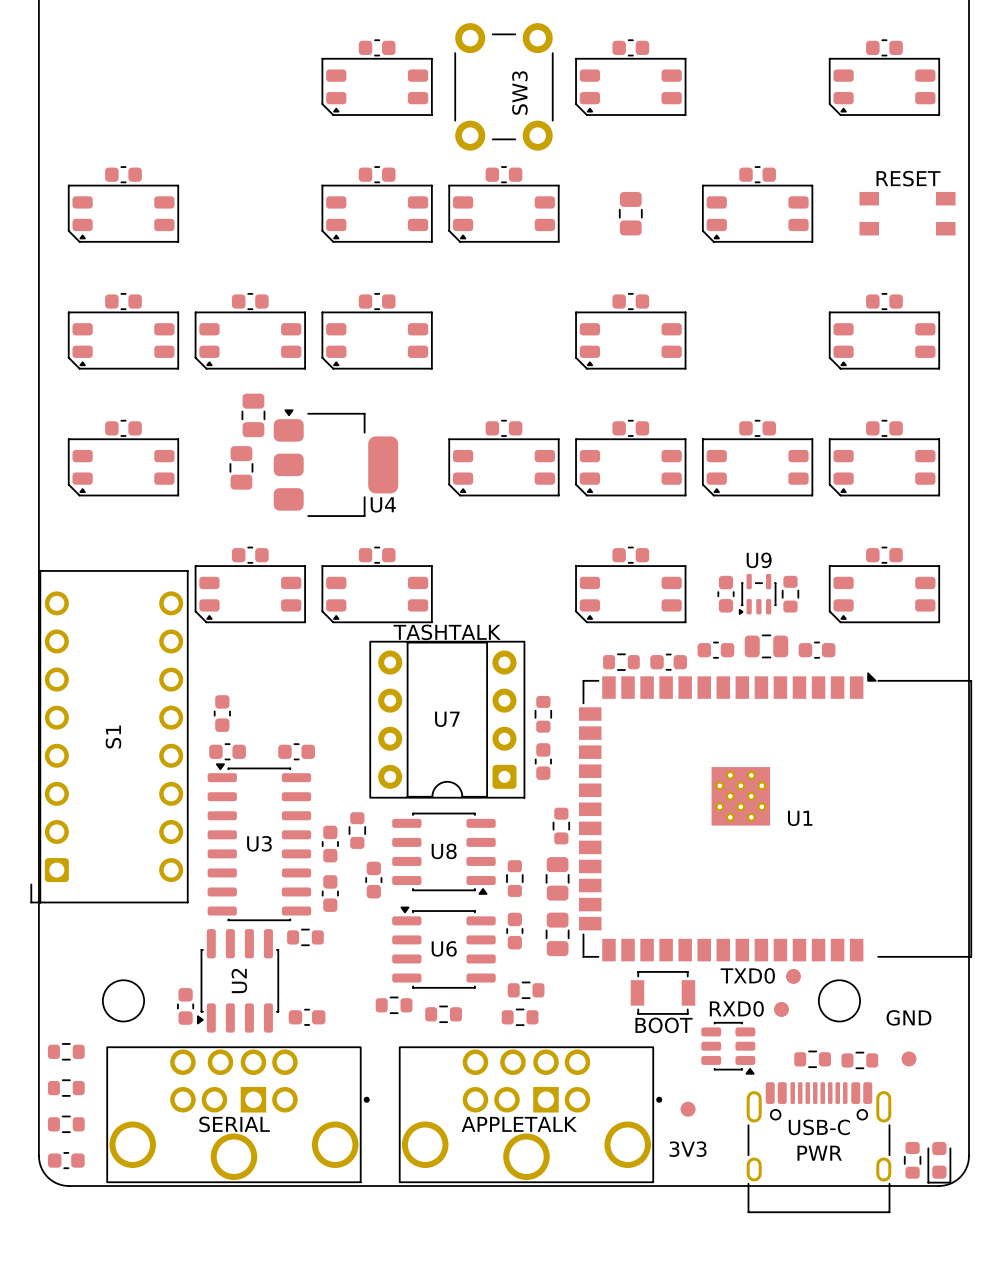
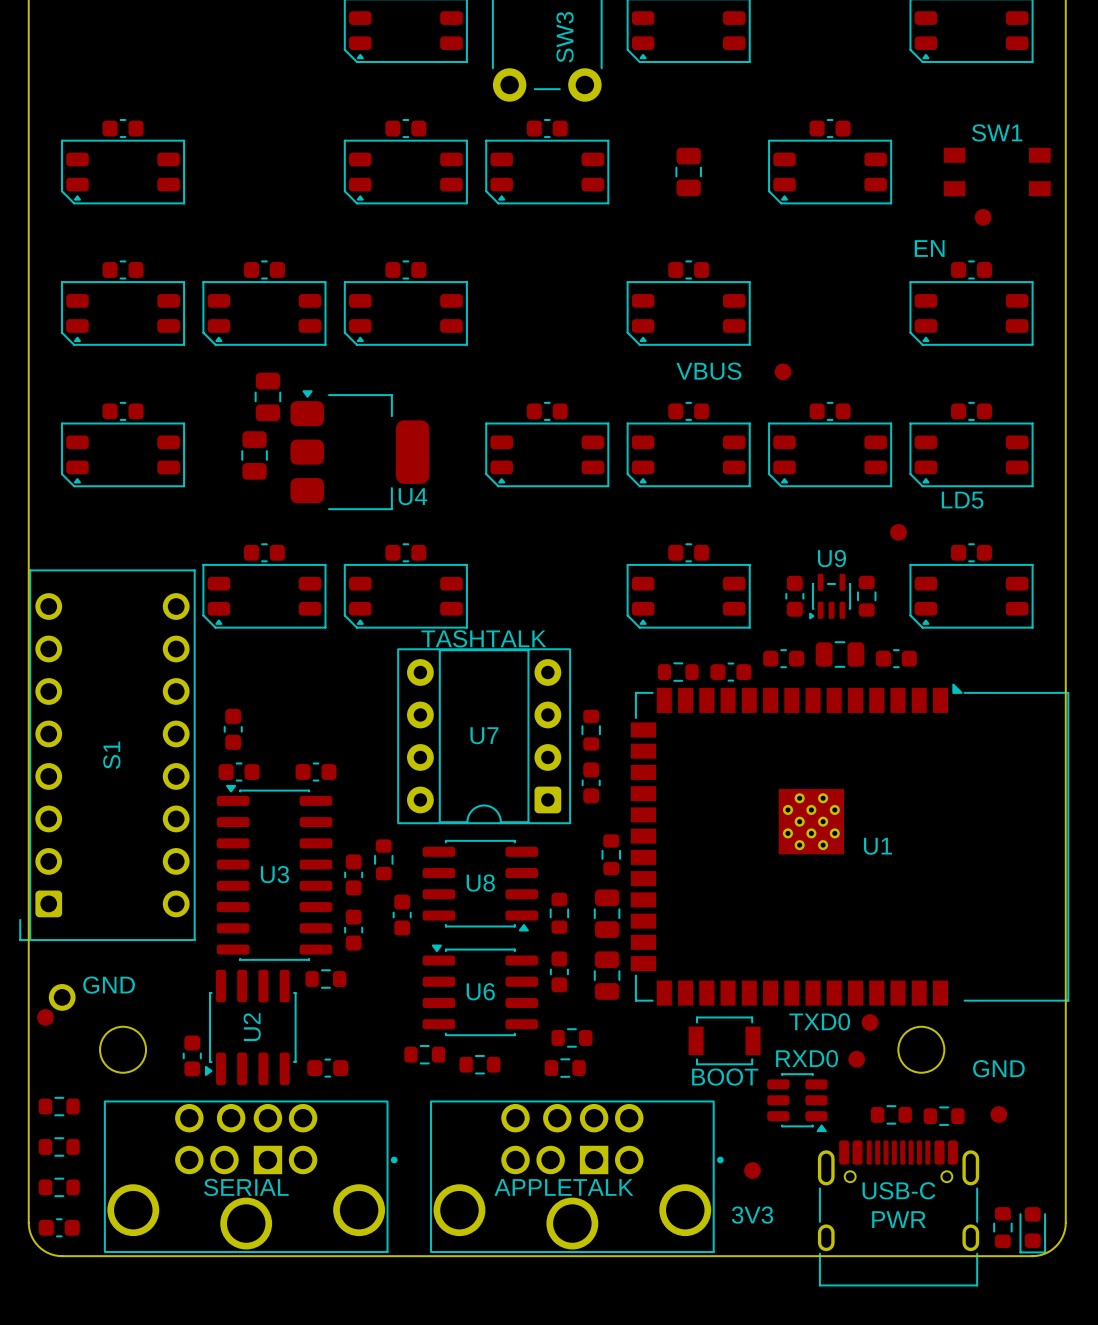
SW1 name: none -> SW1 (997, 132)
SW1 text: RESET (908, 178) -> none
part: none -> (983, 217)
part: none -> (783, 371)
part: none -> (898, 532)
part: none -> (62, 997)
part: none -> (45, 1017)

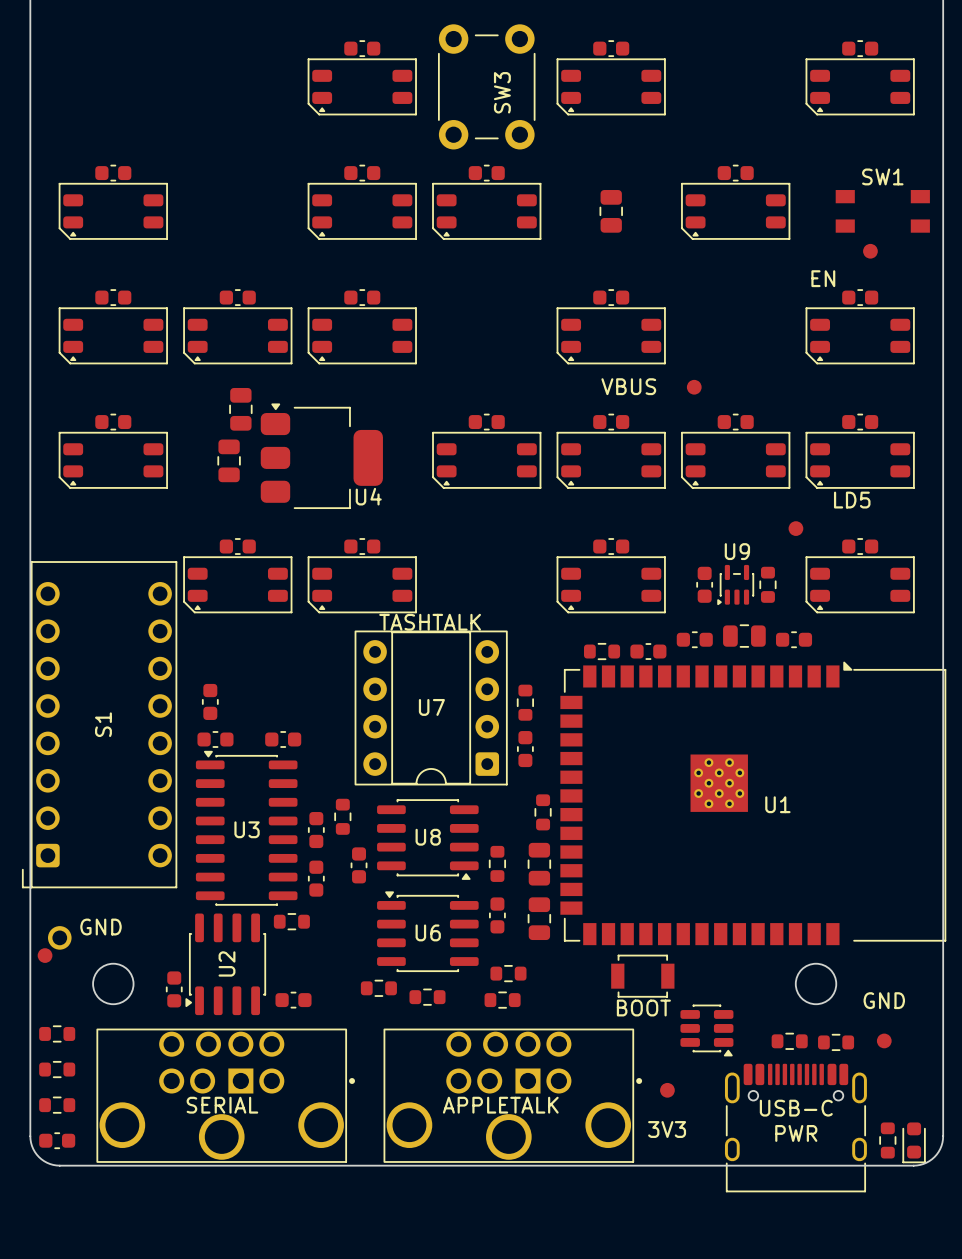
part: (870, 1022) -> none
part: (856, 1059) -> none

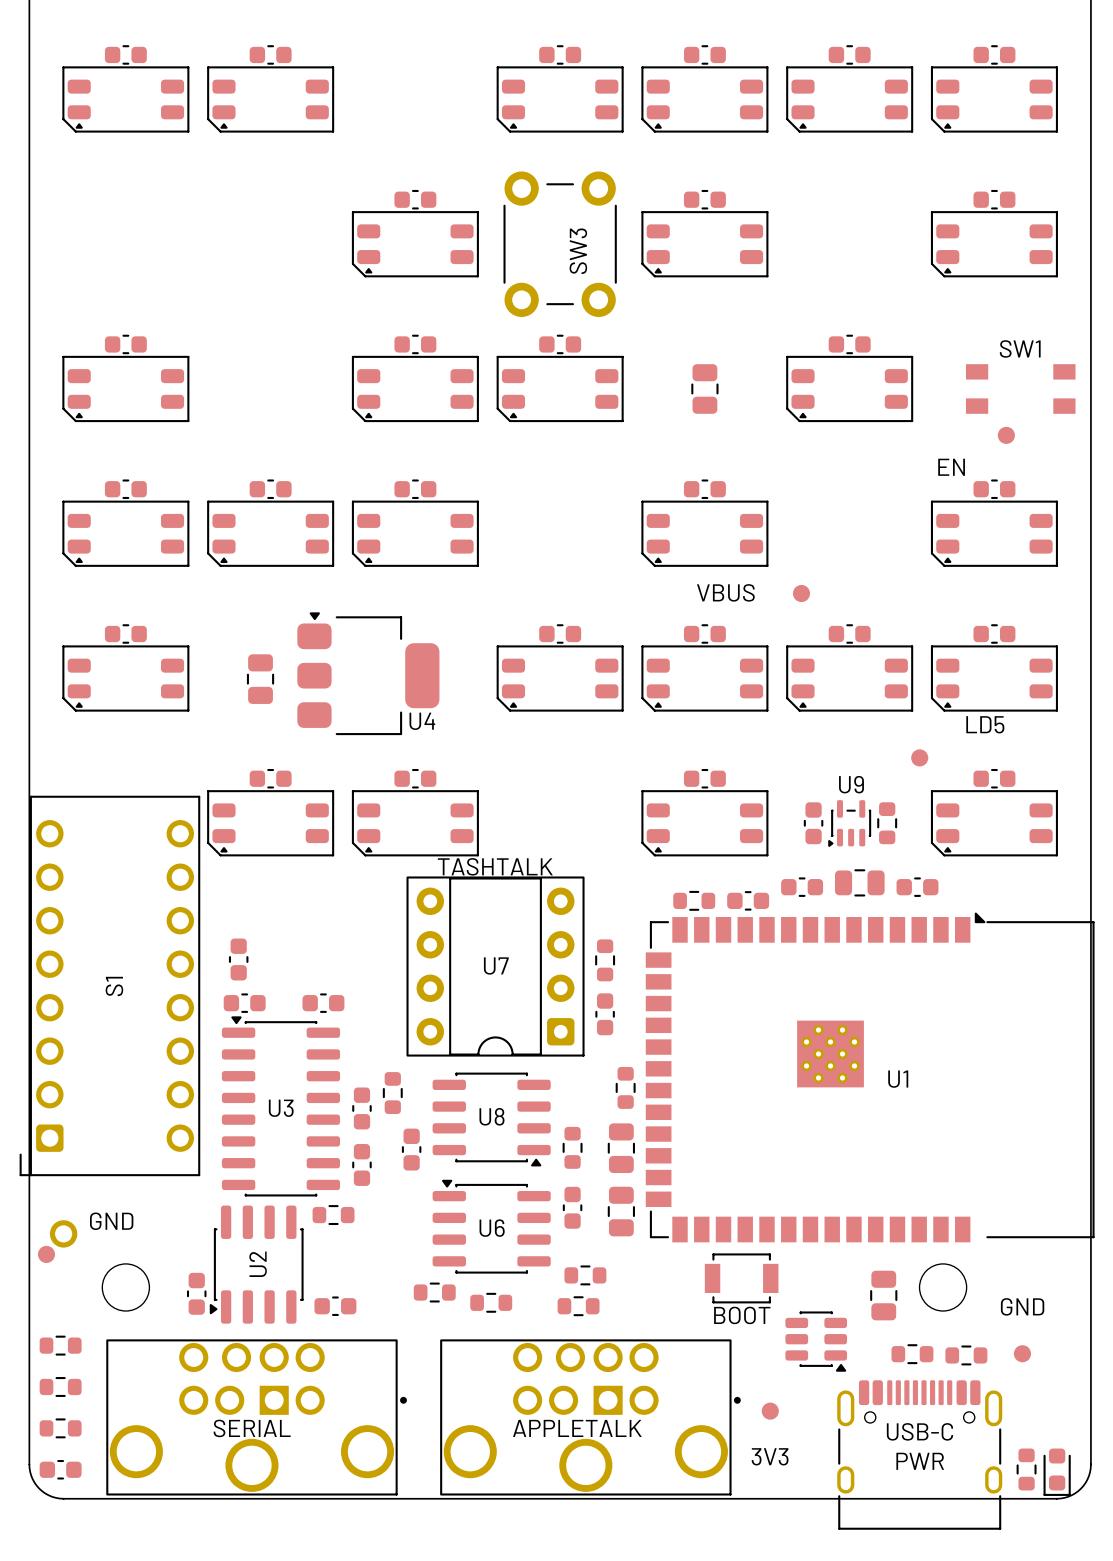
part: (240, 409) -> none
part: none -> (883, 1295)

